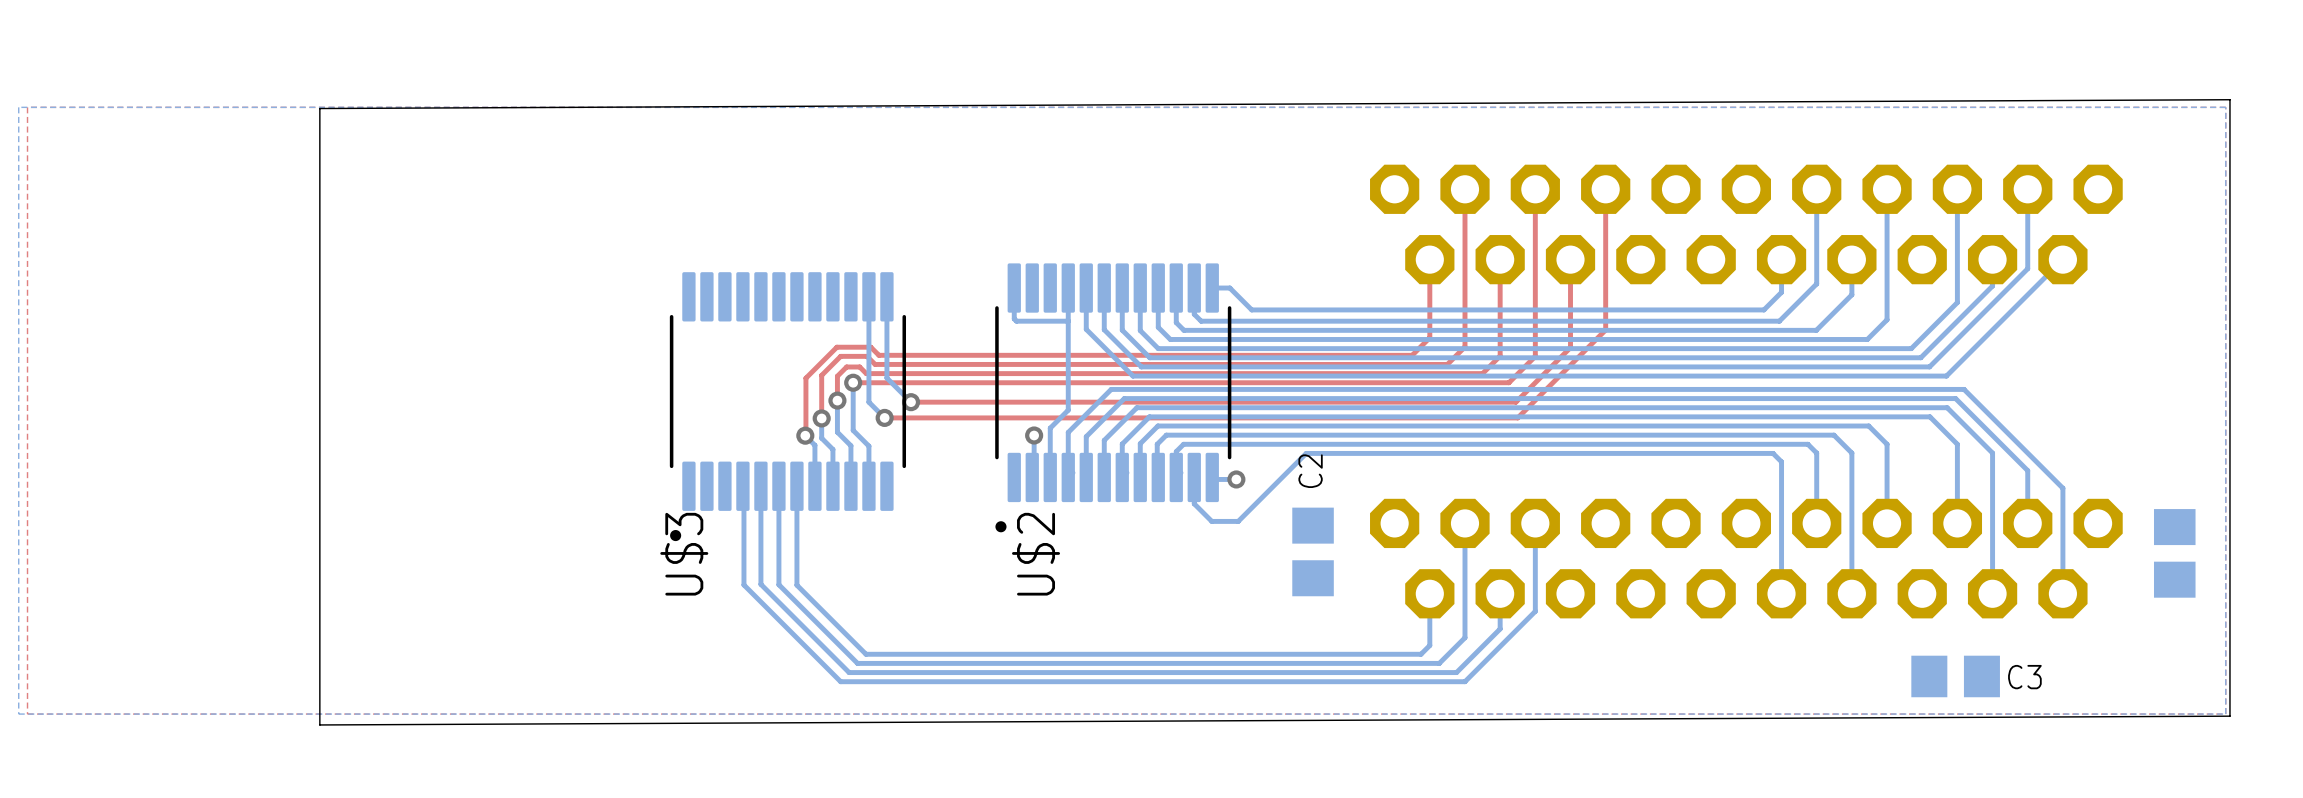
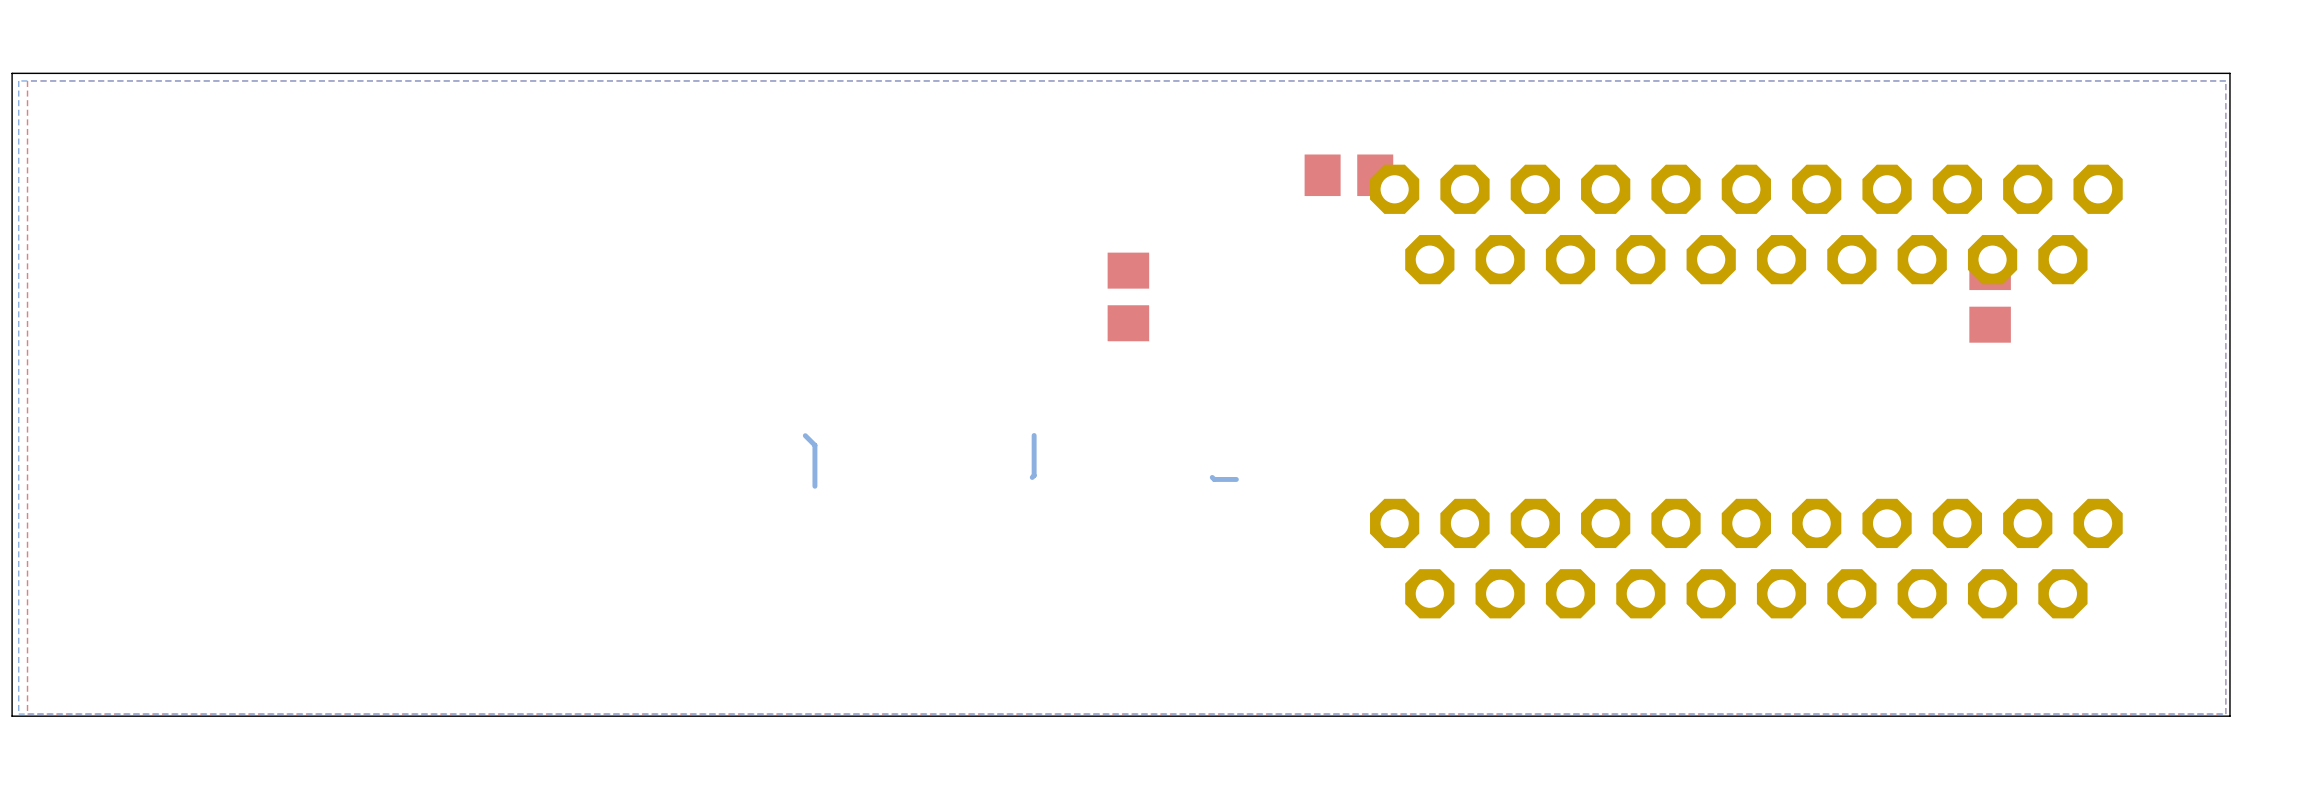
board edge: (2229, 99) (319, 108) (319, 724) (2229, 716) -> (2229, 99) (2229, 73) (12, 73) (12, 716) (2229, 716)
bottom zone outline: (2225, 107) (18, 107) -> (2225, 107) (2225, 80) (18, 80) (18, 107)
part: none -> (1348, 175)
top track: (1464, 189) (1464, 346) (1447, 364) (875, 364) (867, 356) (840, 356) (821, 375) (821, 418) -> none
top track: (1535, 189) (1535, 356) (1508, 382) (853, 382) -> none
top track: (1605, 189) (1605, 329) (1517, 417) (884, 417) -> none
bottom track: (1816, 189) (1816, 283) (1779, 321) (1201, 321) (1194, 314) (1194, 288) -> none
bottom track: (1887, 189) (1887, 319) (1867, 339) (1170, 339) (1158, 327) (1158, 288) -> none
bottom track: (1957, 189) (1957, 302) (1911, 348) (1158, 348) (1140, 330) (1140, 288) -> none
bottom track: (2027, 189) (2027, 268) (1929, 366) (1141, 366) (1104, 329) (1104, 288) -> none
top track: (1429, 259) (1429, 337) (1412, 355) (878, 355) (870, 347) (836, 347) (805, 378) (805, 435) -> none
top track: (1500, 259) (1500, 356) (1482, 373) (866, 373) (859, 366) (846, 366) (837, 376) (837, 400) -> none
top track: (1570, 259) (1570, 347) (1515, 402) (911, 402) -> none
bottom track: (1781, 259) (1781, 292) (1763, 309) (1251, 309) (1229, 288) (1212, 288) -> none
bottom track: (1851, 259) (1851, 294) (1816, 330) (1183, 330) (1176, 322) (1176, 288) -> none
bottom track: (1992, 259) (1992, 286) (1920, 357) (1149, 357) (1122, 330) (1122, 288) -> none
bottom track: (2062, 259) (1946, 376) (1132, 376) (1086, 329) (1086, 288) -> none
bottom track: (1014, 288) (1014, 318) (1016, 321) (1068, 321) -> none
bottom track: (1068, 288) (1068, 410) (1050, 428) (1050, 477) -> none
bottom track: (868, 296) (868, 402) (884, 417) -> none
bottom track: (886, 296) (886, 378) (911, 402) -> none
bottom track: (853, 382) (853, 430) (868, 446) (868, 486) -> none
via: (853, 382) -> none
U$2: (1113, 397) -> none
bottom track: (837, 400) (837, 432) (850, 445) (850, 486) -> none
via: (837, 400) -> none
via: (911, 402) -> none
U$3: (787, 406) -> none
via: (884, 417) -> none
bottom track: (821, 418) (821, 438) (832, 449) (832, 486) -> none
via: (821, 418) -> none
via: (805, 435) -> none
via: (1034, 435) -> none
bottom track: (1072, 472) (1068, 477) (1068, 432) (1111, 389) (1964, 389) (2062, 488) (2062, 593) -> none
bottom track: (1126, 472) (1122, 477) (1122, 444) (1149, 416) (1929, 416) (1957, 444) (1957, 523) -> none
bottom track: (1180, 472) (1176, 477) (1176, 451) (1183, 444) (1807, 444) (1816, 453) (1816, 523) -> none
bottom track: (1086, 477) (1086, 436) (1124, 398) (1955, 398) (2027, 470) (2027, 523) -> none
bottom track: (1104, 477) (1104, 440) (1136, 407) (1947, 407) (1992, 453) (1992, 593) -> none
bottom track: (1140, 477) (1140, 443) (1157, 426) (1868, 426) (1887, 444) (1887, 523) -> none
bottom track: (1158, 477) (1157, 444) (1166, 435) (1833, 435) (1851, 453) (1851, 593) -> none
bottom track: (1194, 477) (1194, 503) (1211, 521) (1238, 521) (1306, 453) (1773, 453) (1781, 461) (1781, 593) -> none
via: (1236, 479) -> none
bottom track: (742, 486) (743, 584) (840, 681) (1464, 681) (1535, 611) (1535, 523) -> none
bottom track: (760, 486) (760, 584) (849, 672) (1456, 672) (1500, 628) (1500, 593) -> none
bottom track: (778, 486) (778, 584) (857, 663) (1439, 663) (1464, 637) (1464, 523) -> none
bottom track: (796, 486) (796, 585) (866, 654) (1421, 654) (1429, 645) (1429, 593) -> none
C2 side: bottom (1313, 551) -> top (1128, 296)
part side: bottom (2174, 553) -> top (1990, 298)
C3: (1955, 676) -> none

